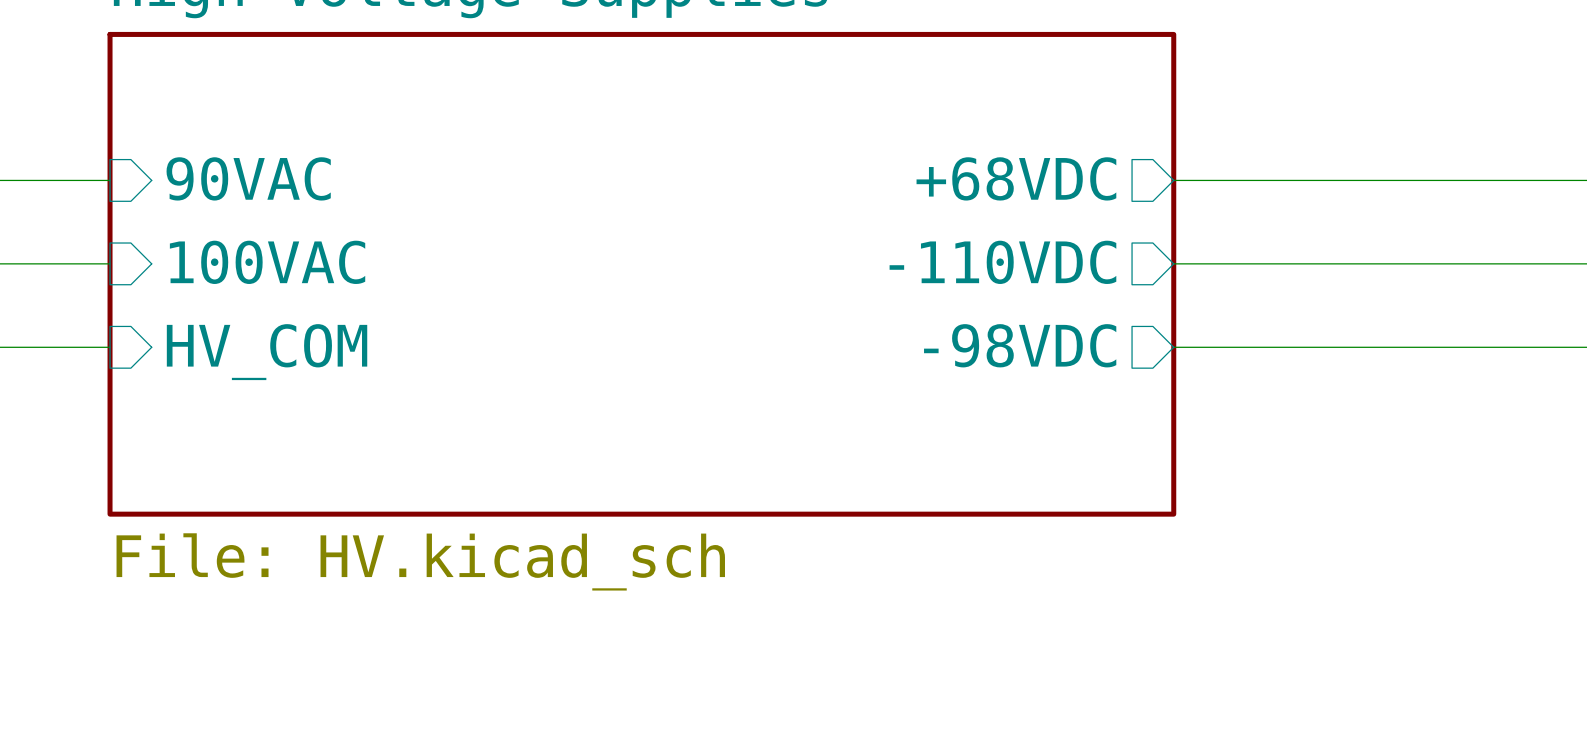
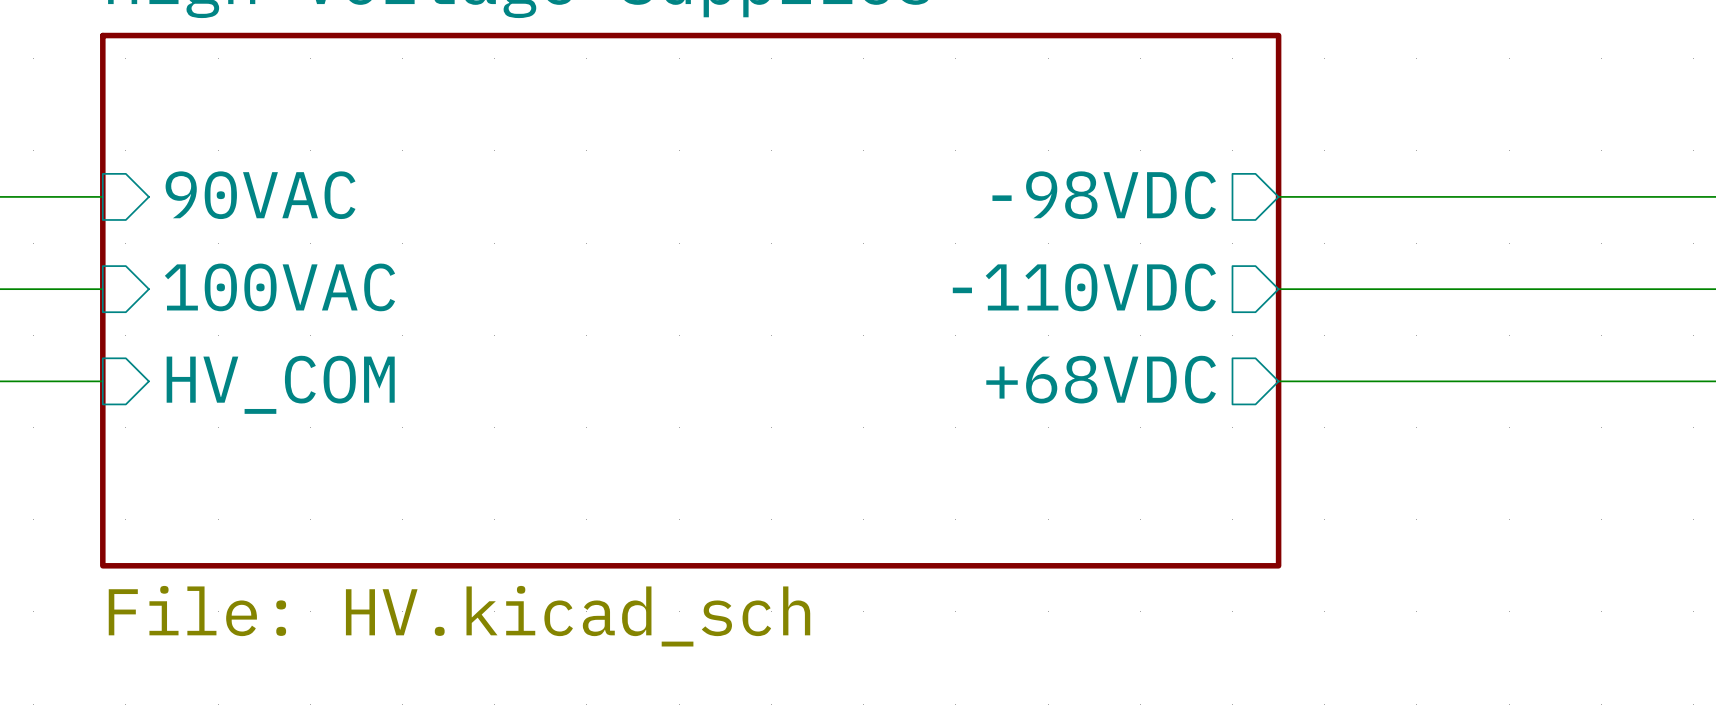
sheet pin: +68VDC (1016, 178) -> -98VDC (1104, 195)
sheet pin: -98VDC (1020, 345) -> +68VDC (1101, 379)

